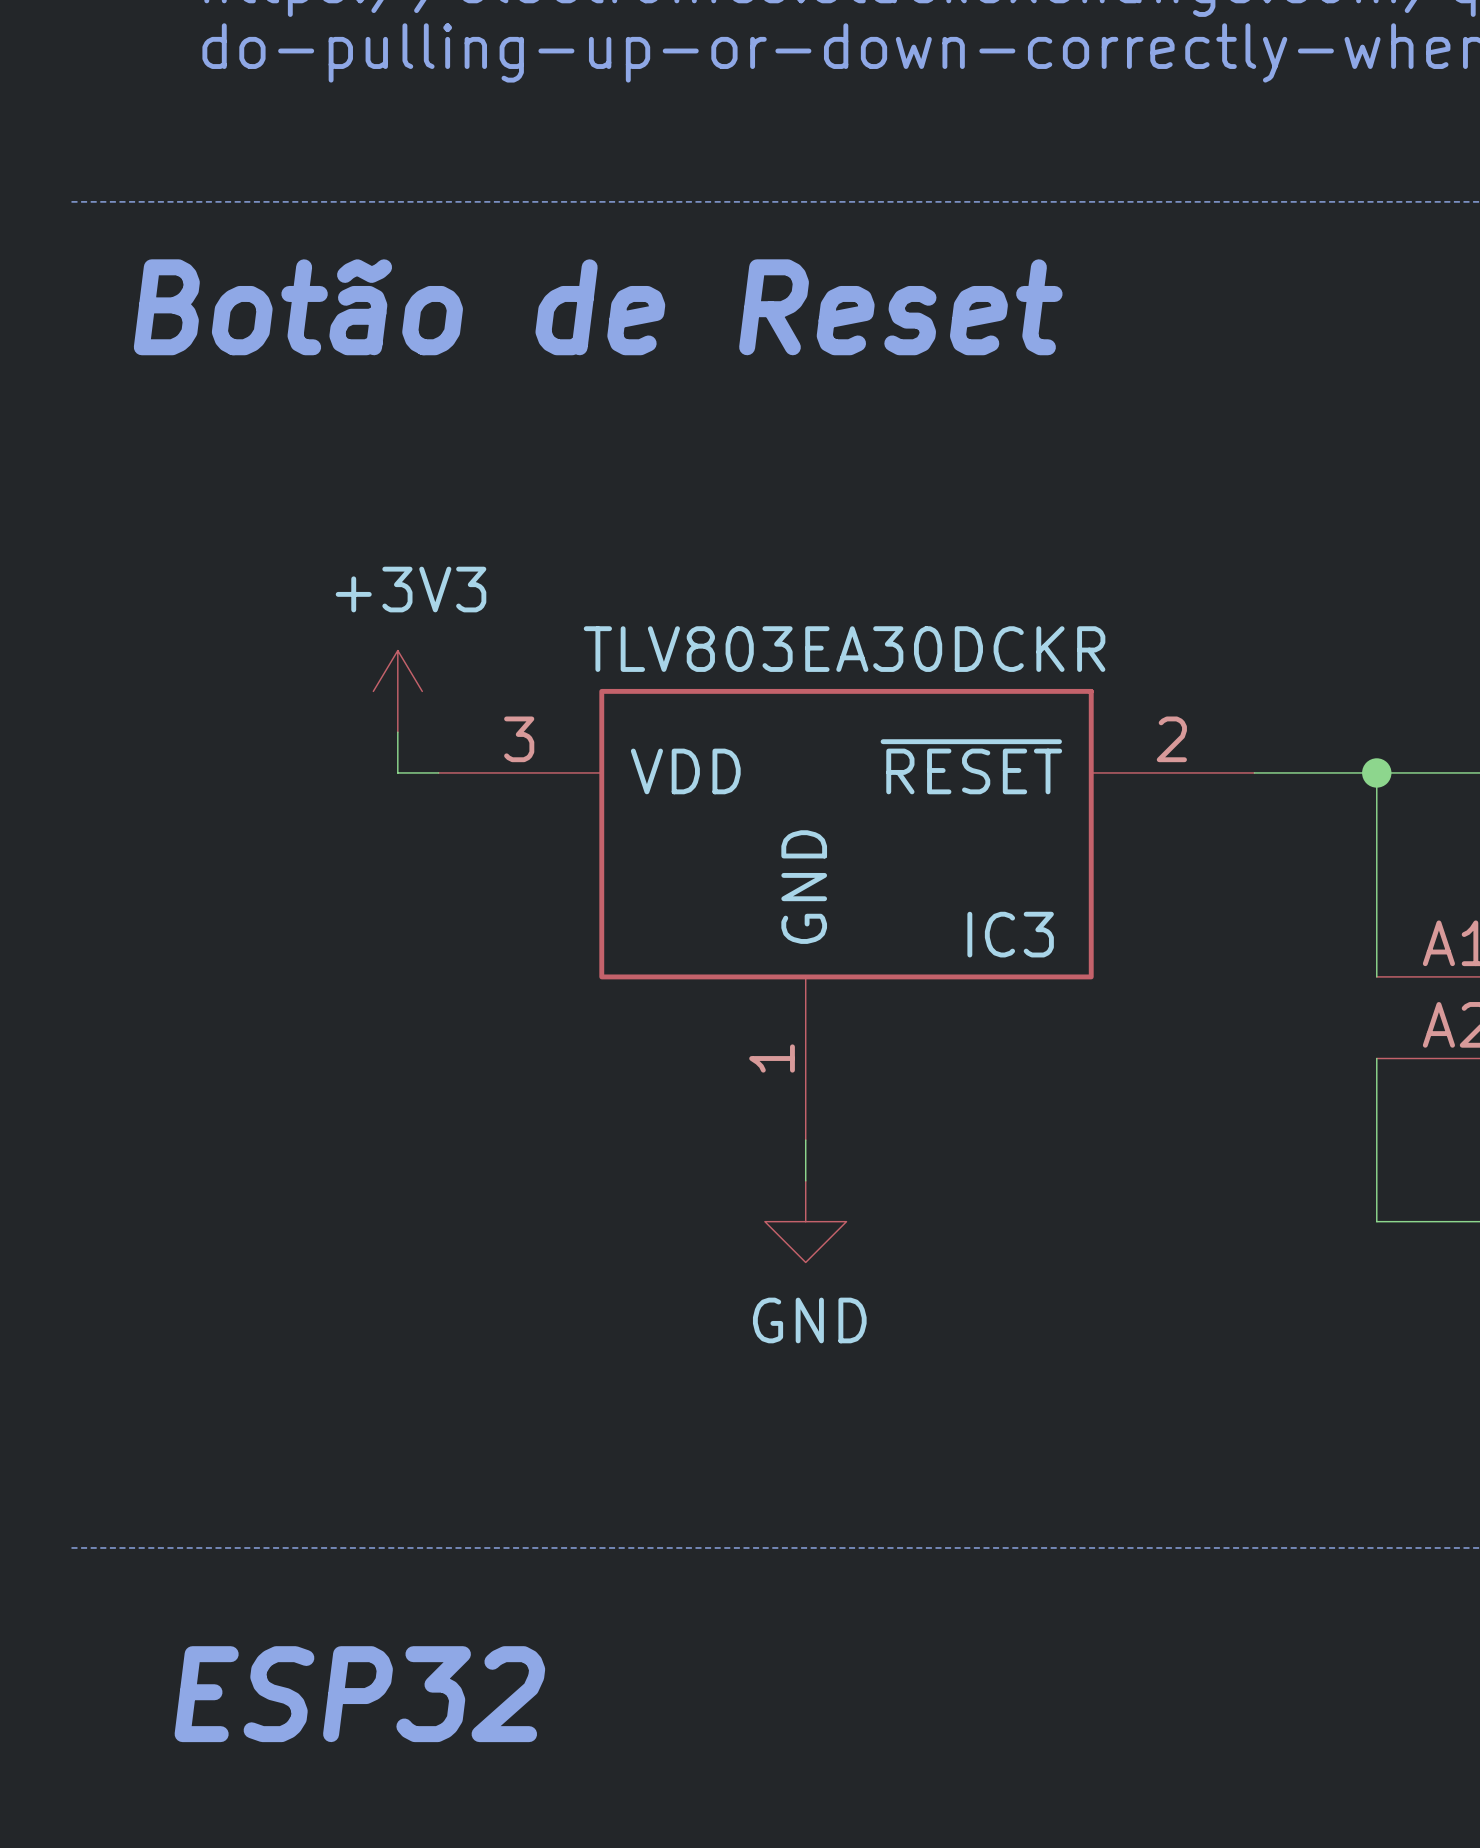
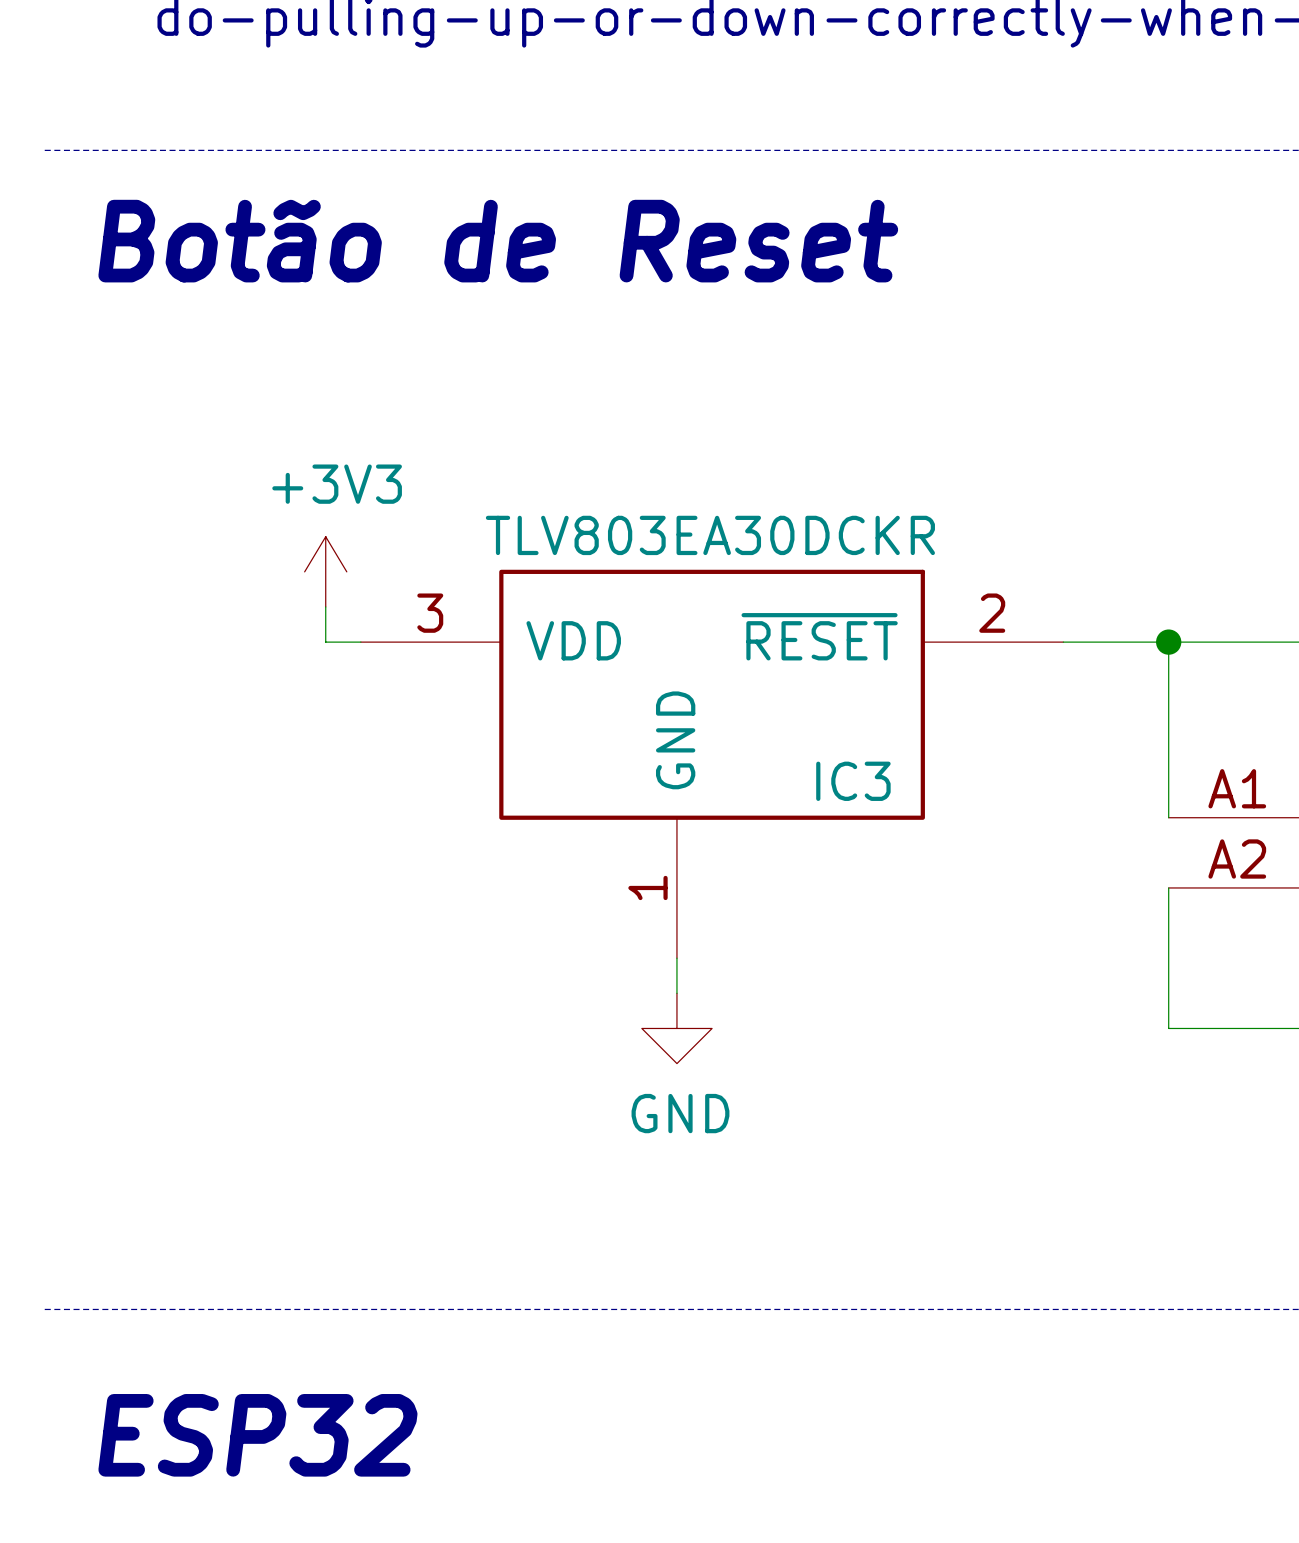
text position: ESP32 (359, 1694) -> ESP32 (257, 1435)

